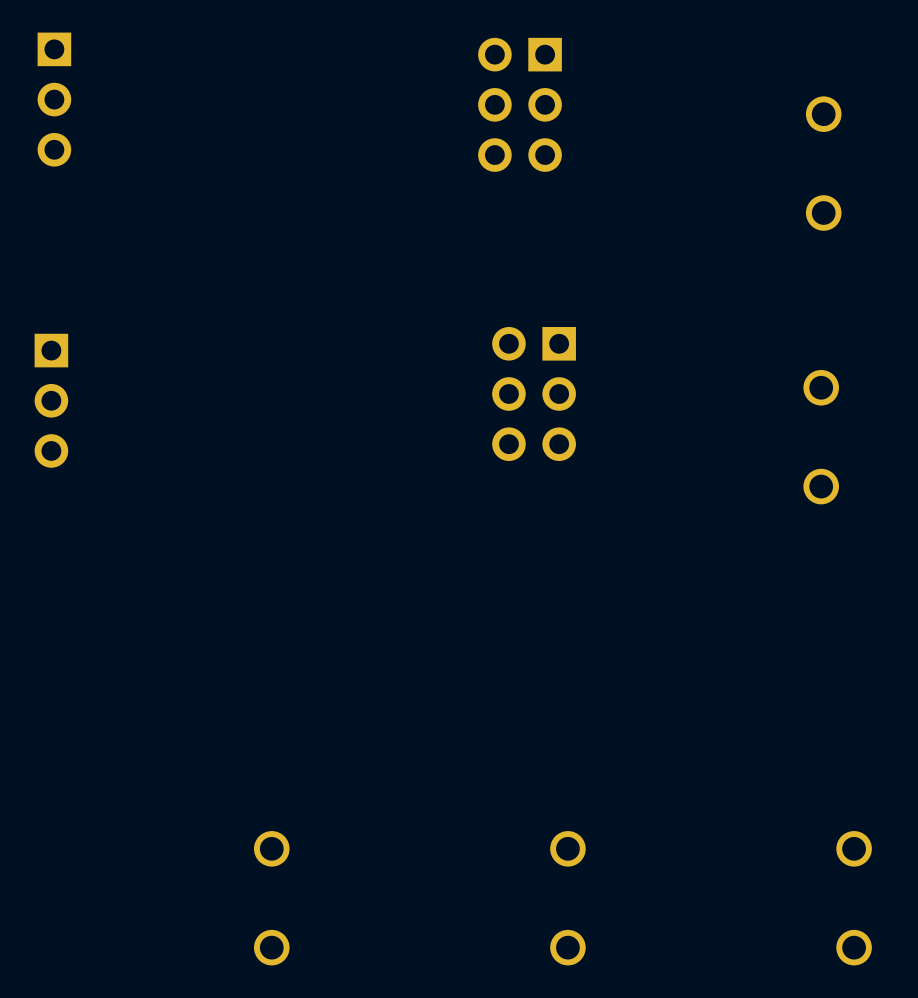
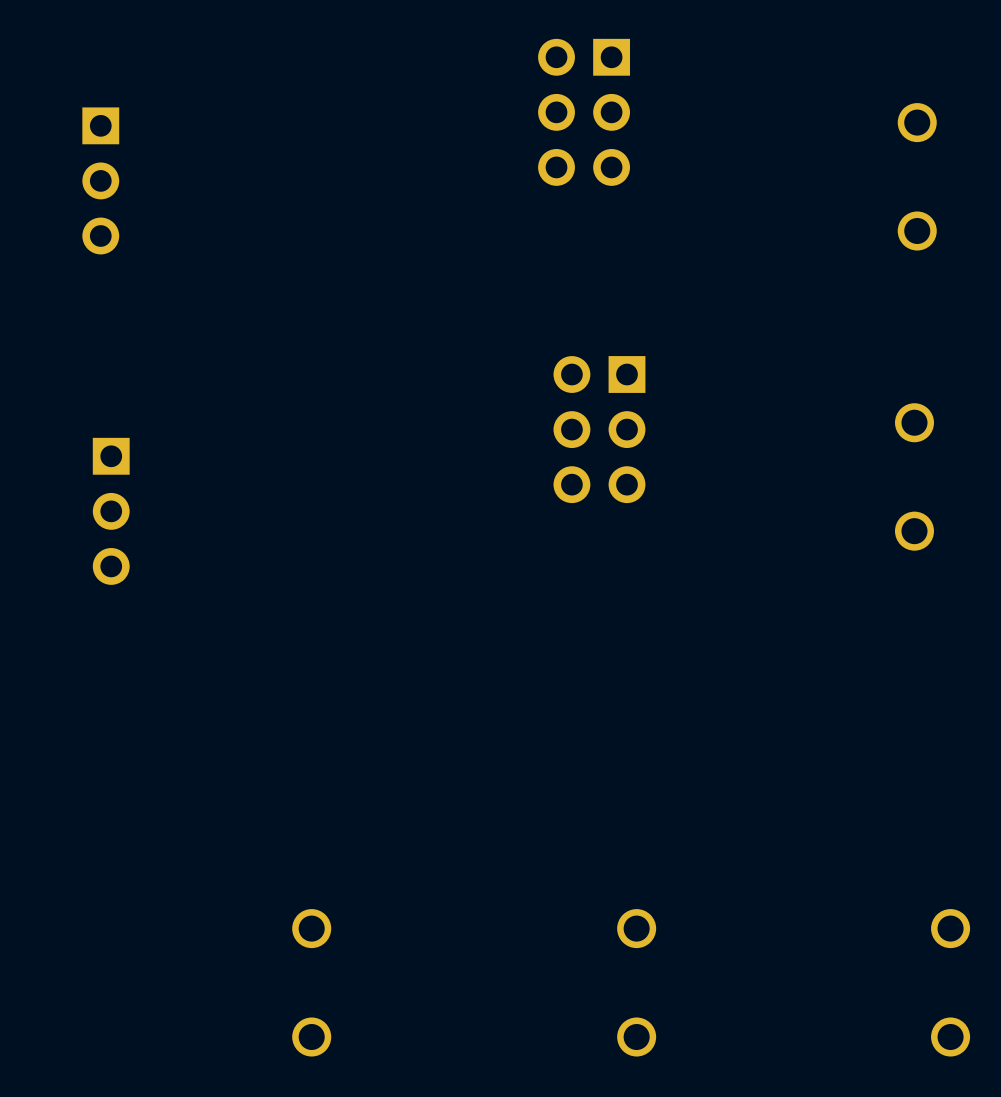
part position: (54, 99) -> (100, 180)
part position: (51, 400) -> (111, 511)

